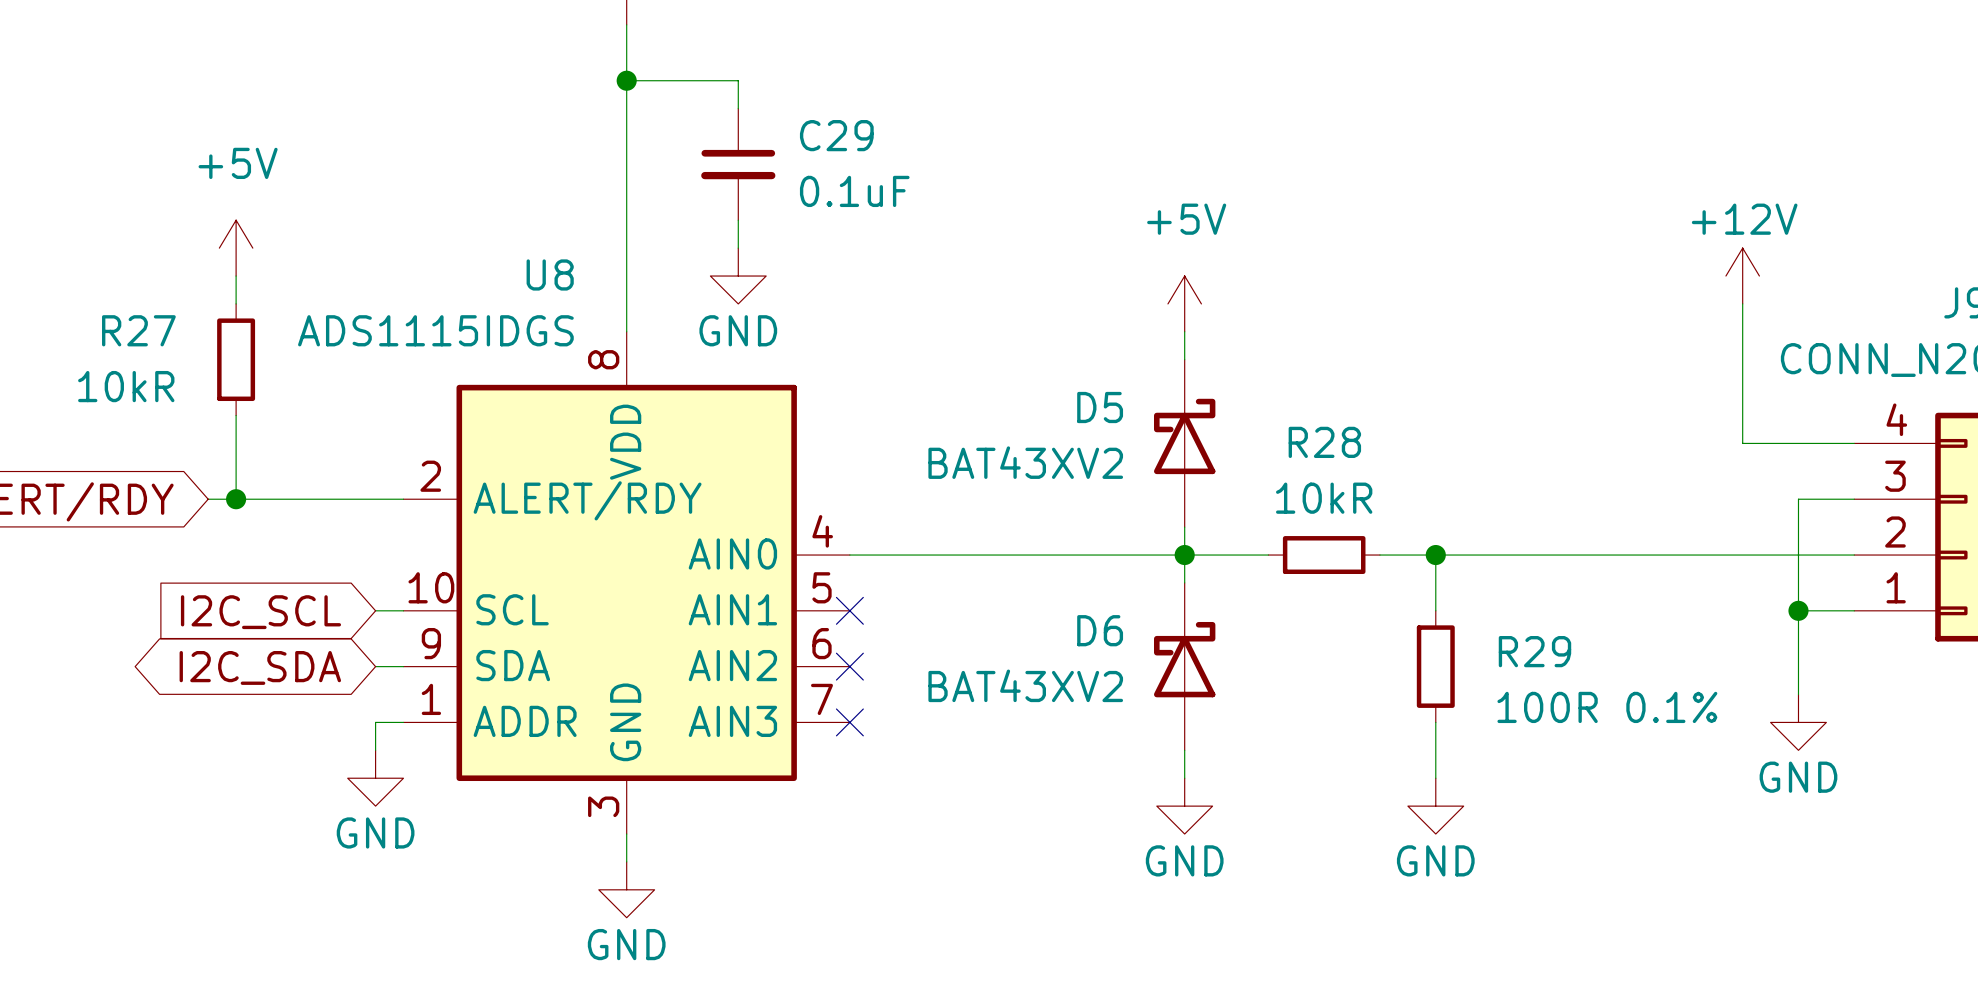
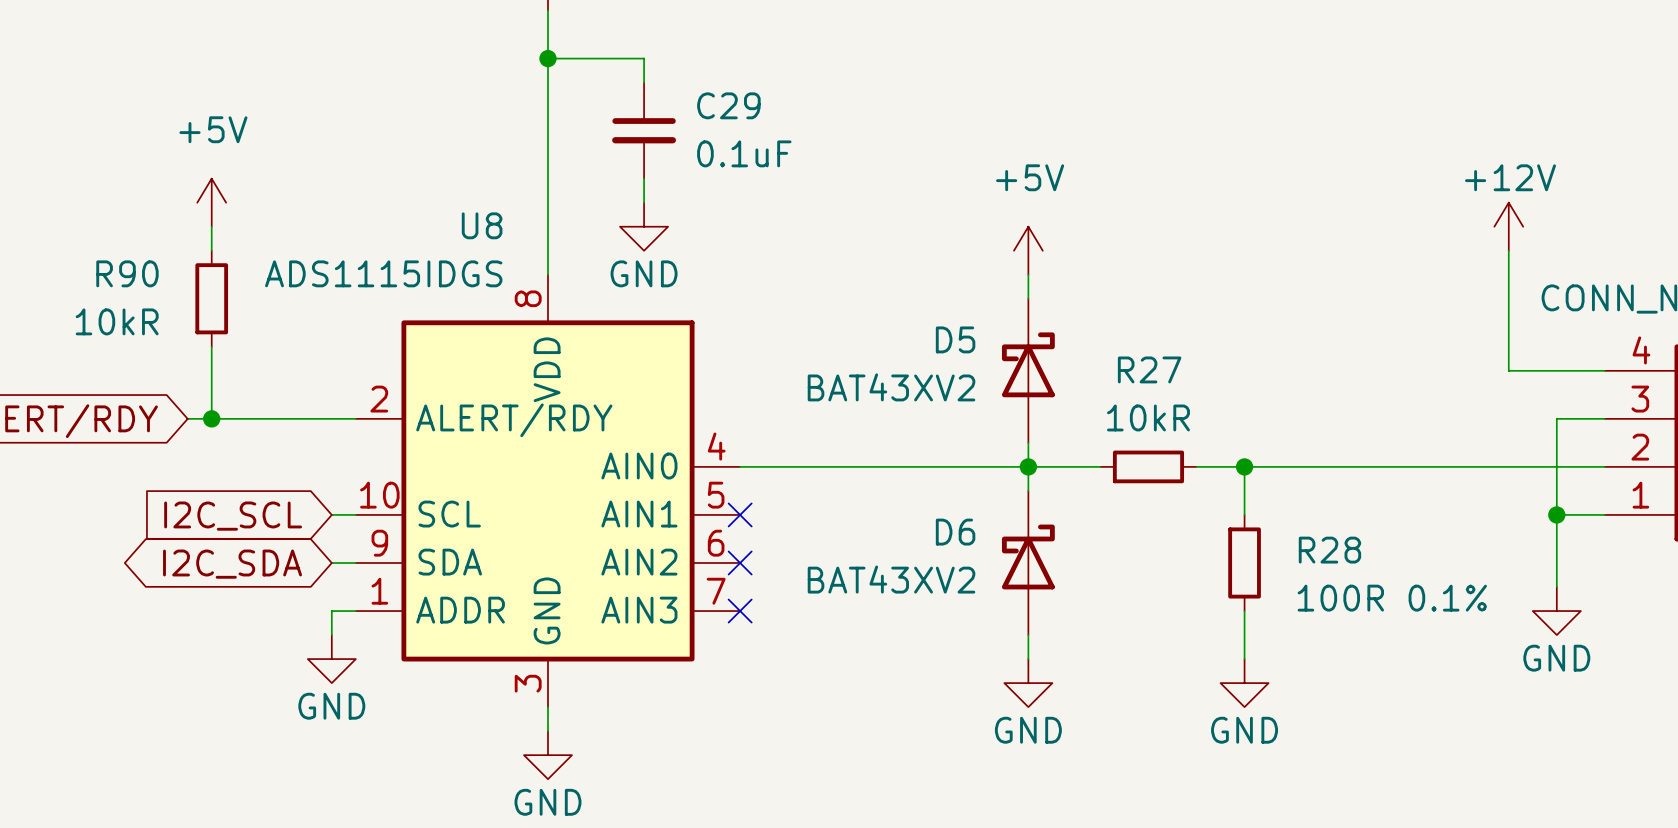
R27 name: R27 (138, 330) -> R90 (127, 273)
R28 name: R28 (1324, 442) -> R27 (1149, 369)
R29 name: R29 (1534, 651) -> R28 (1329, 550)

